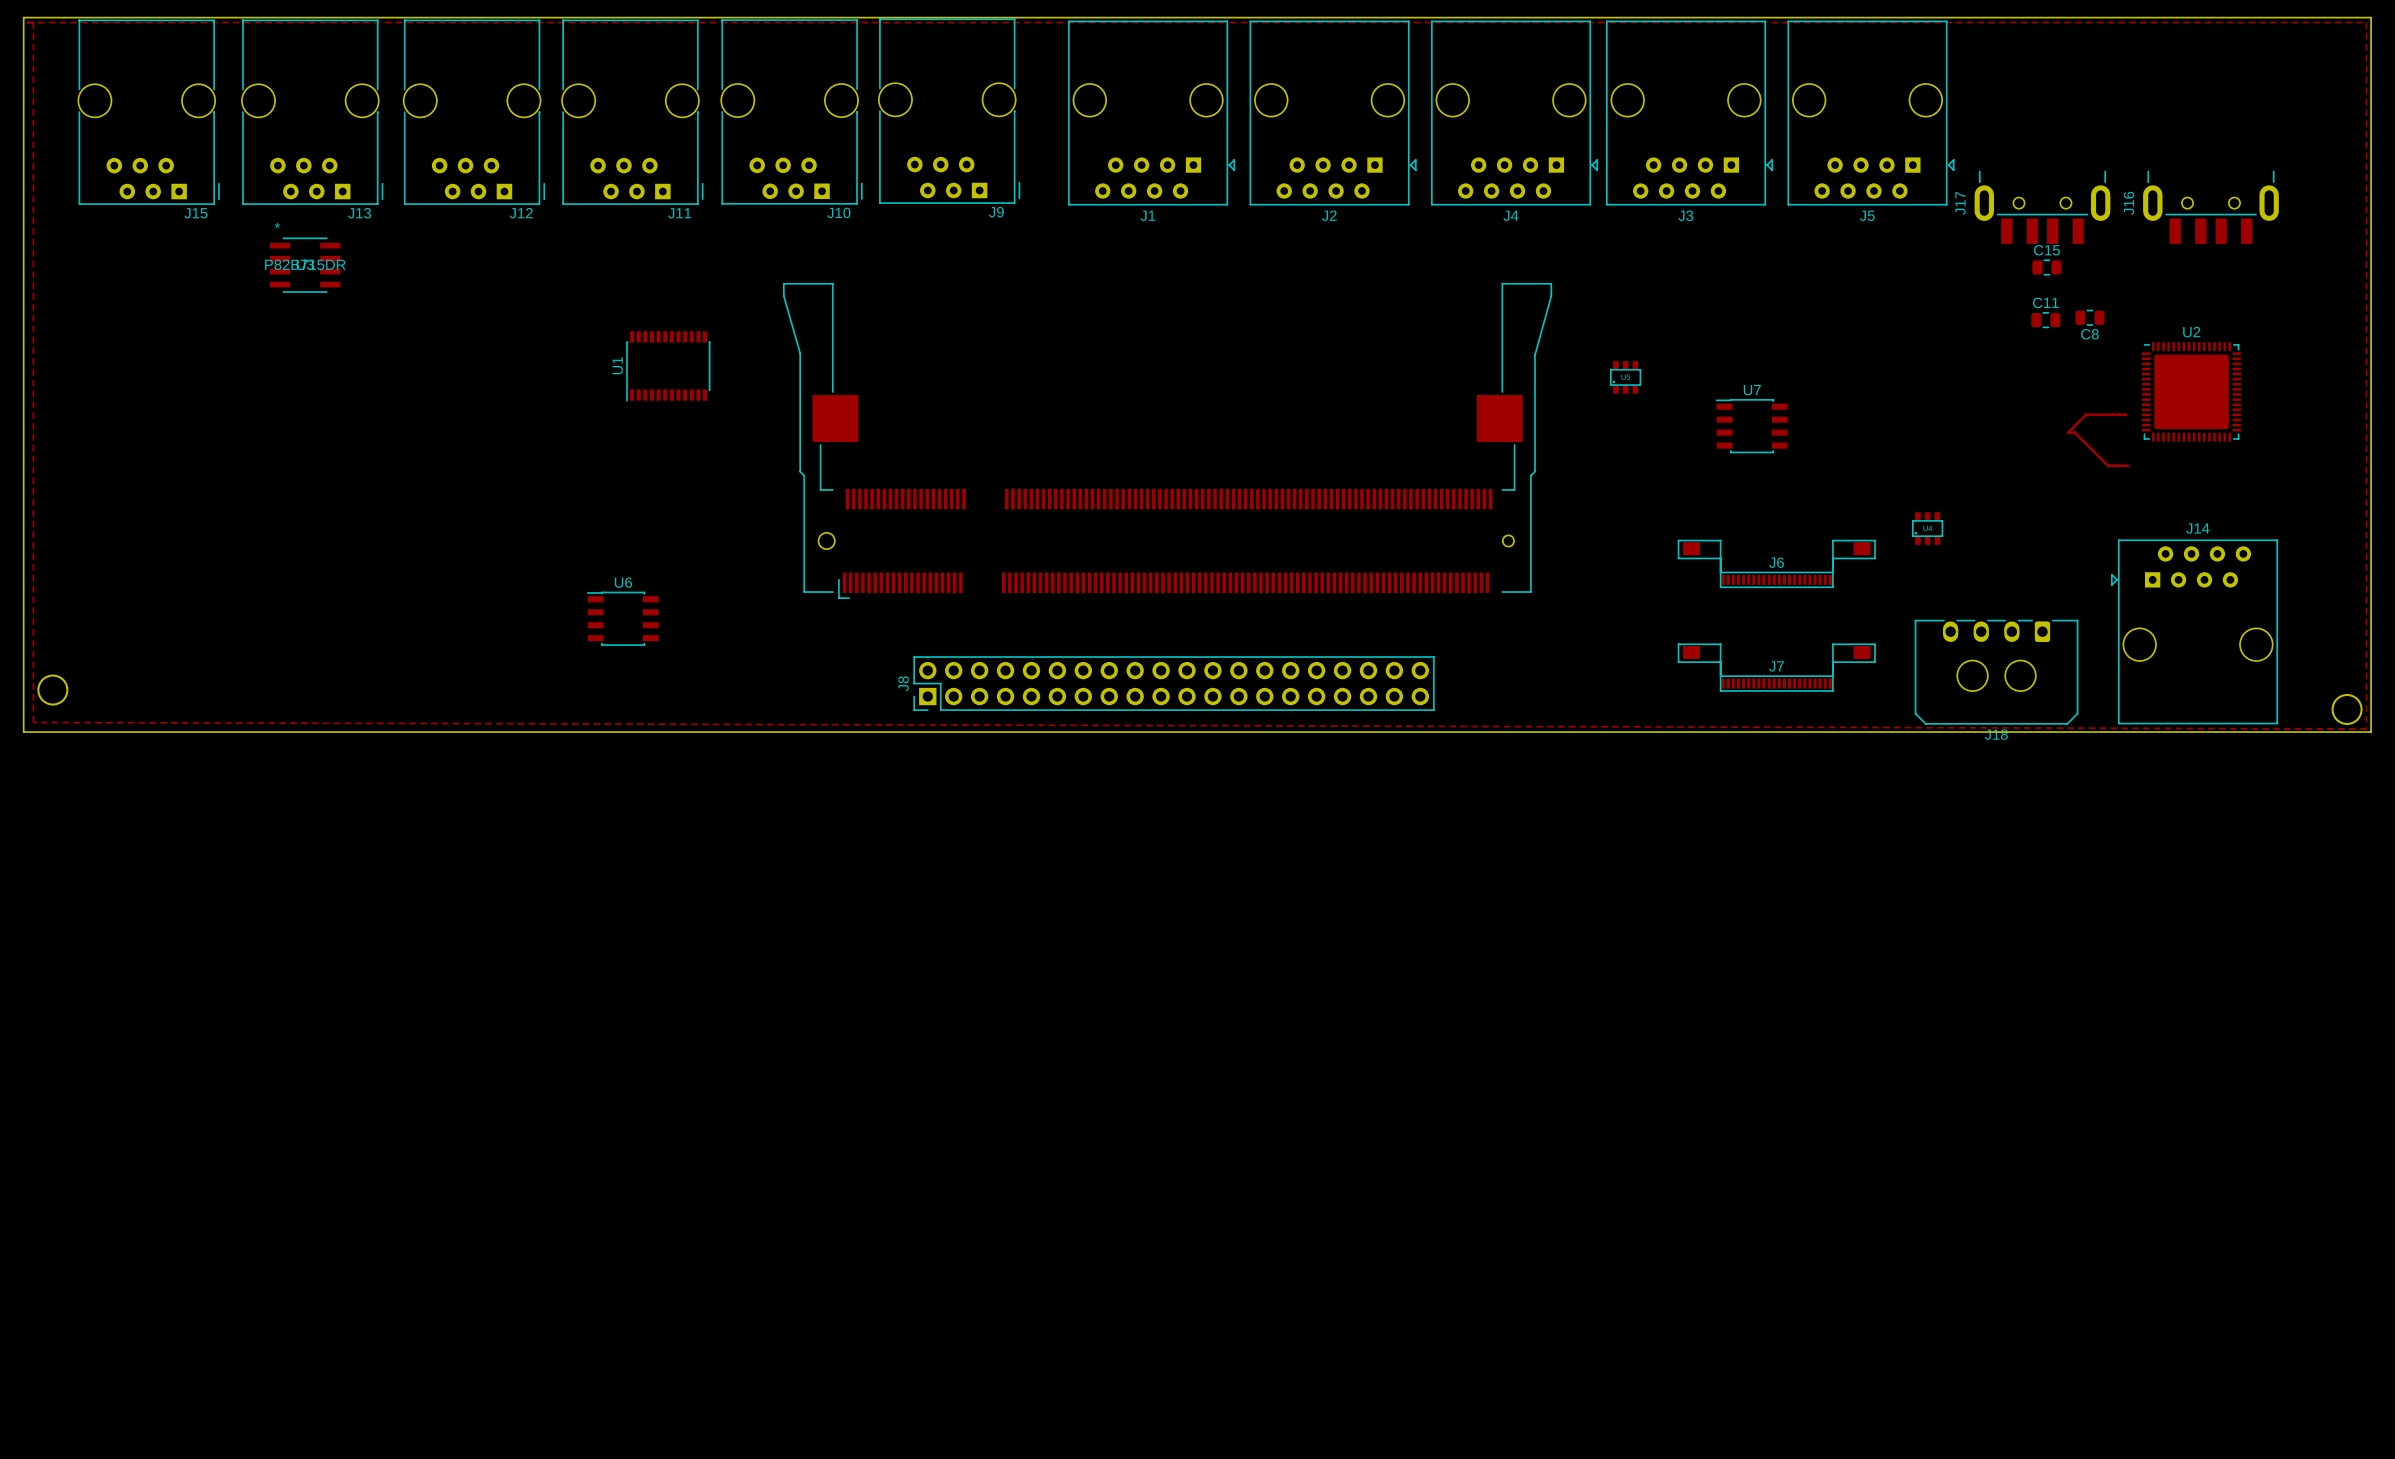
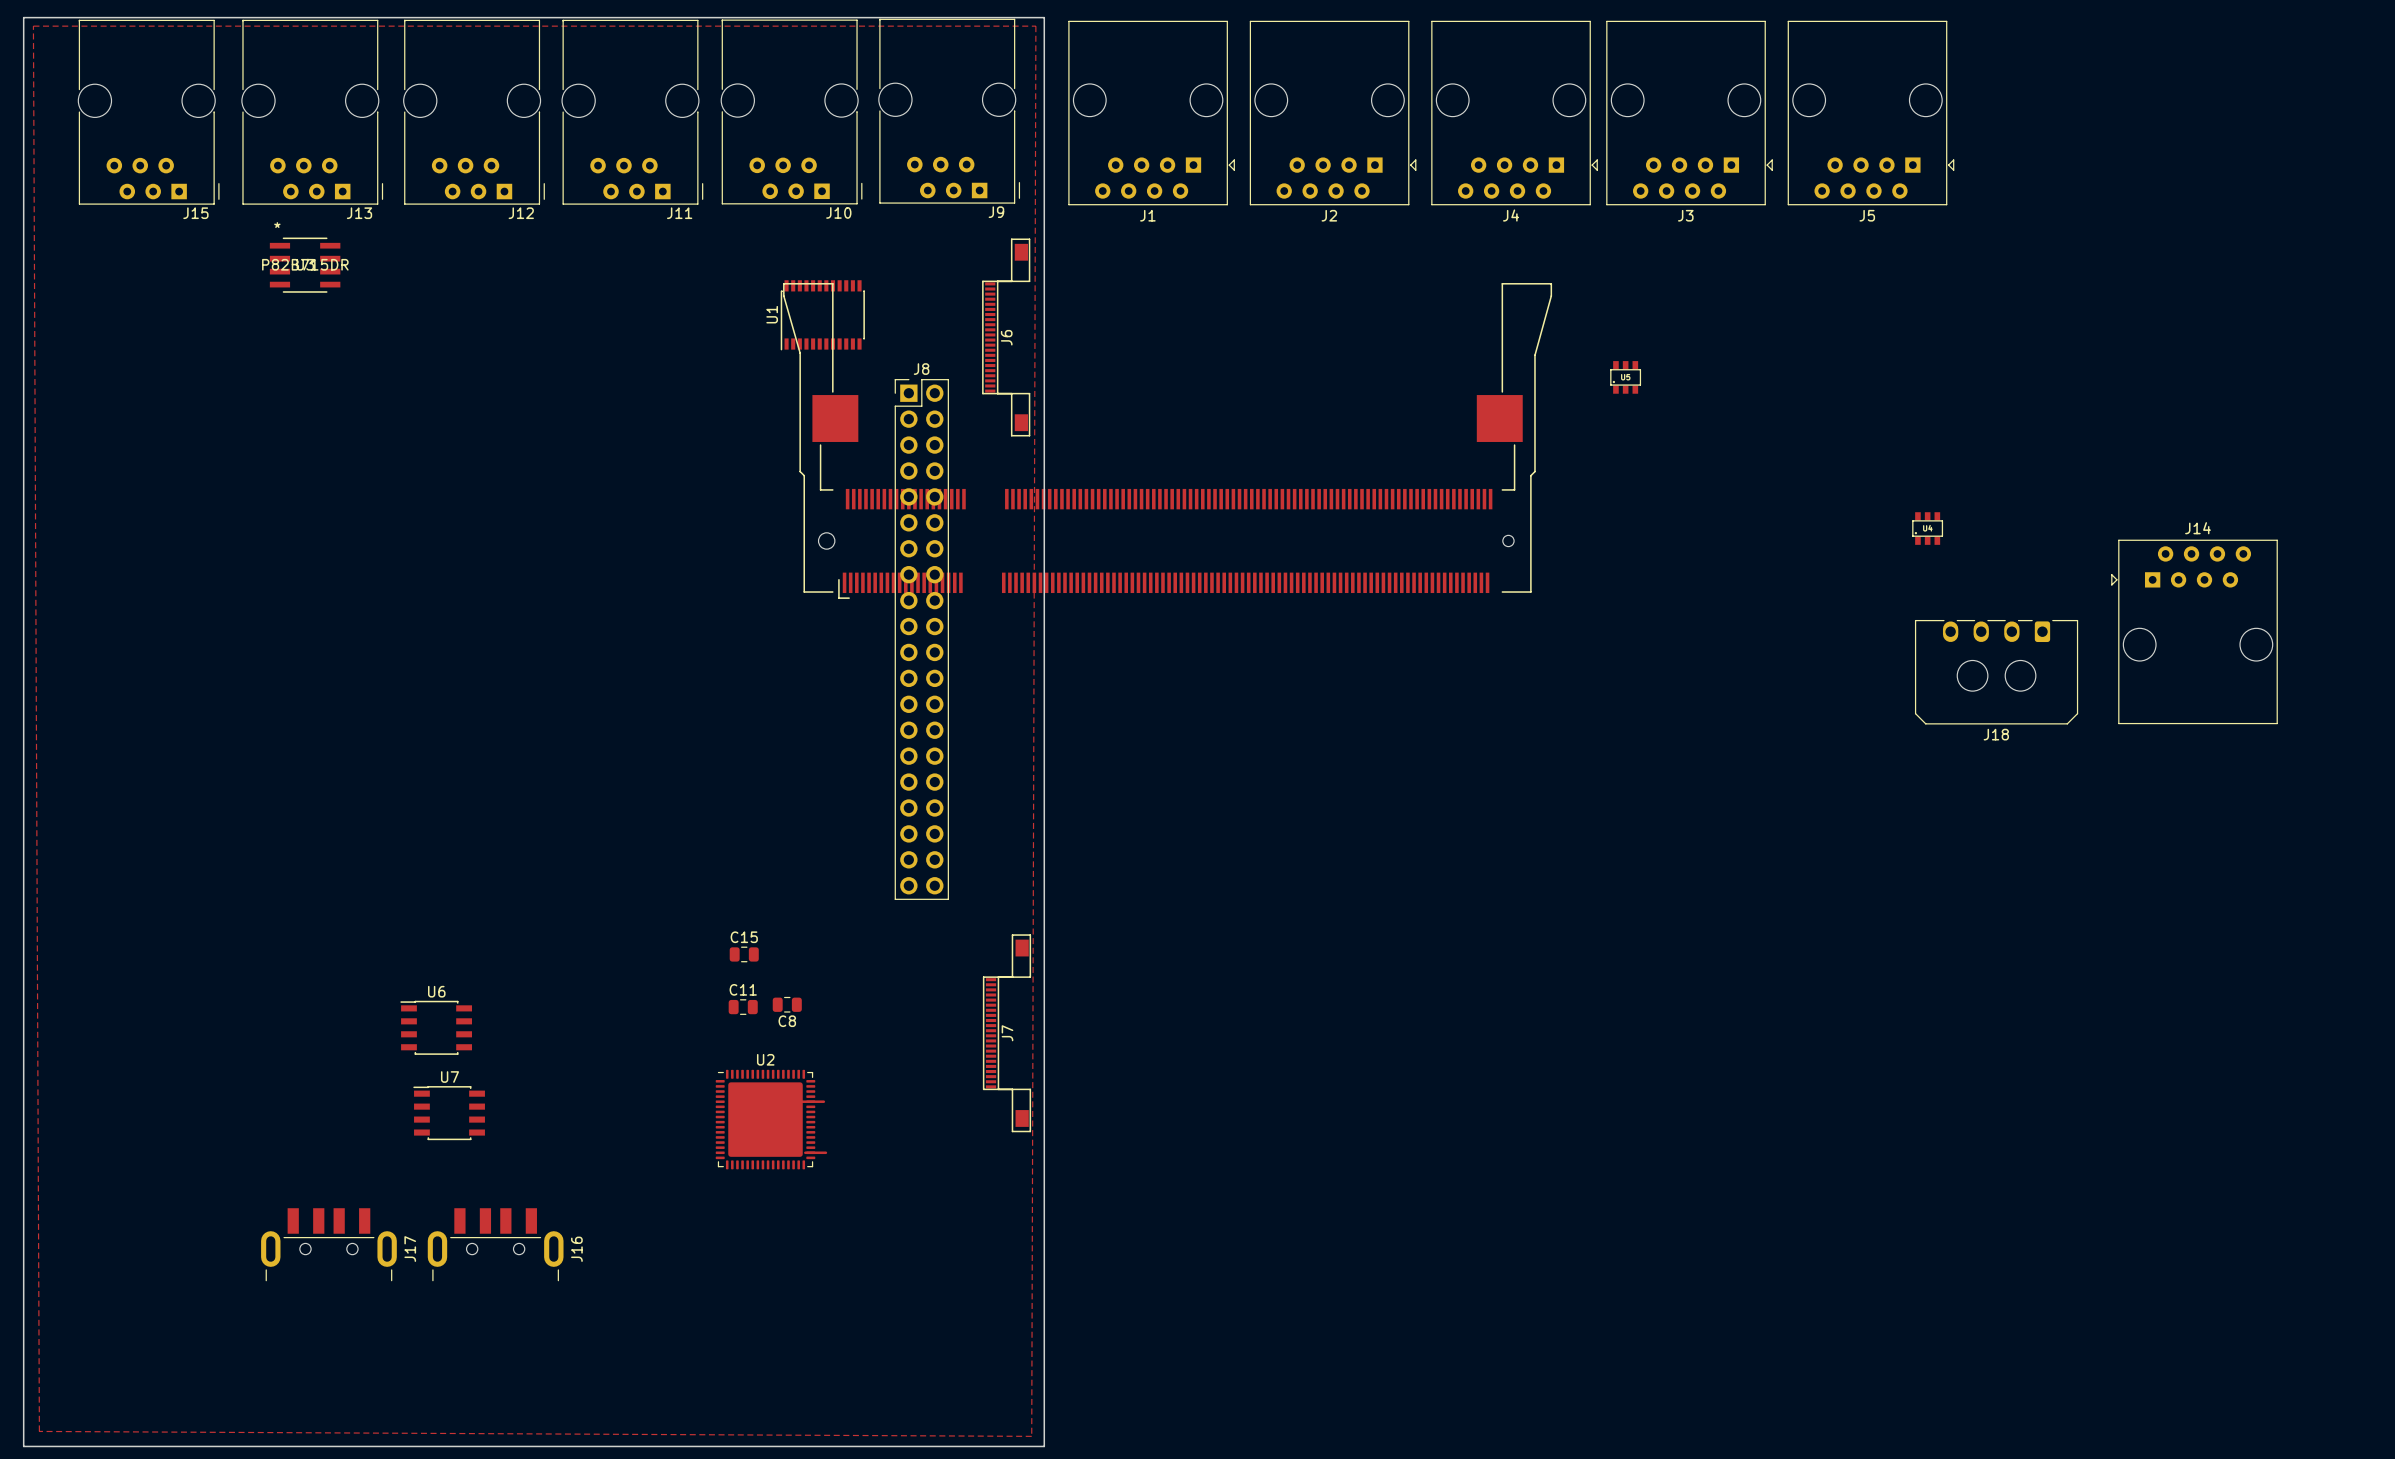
board edge: (1044, 17) (2371, 17) (2371, 732) (23, 732) -> (1044, 17) (1044, 1446) (23, 1446) (23, 732)
zone outline: (26, 22) (2366, 22) (2366, 728) (33, 722) (33, 22) -> none
zone outline: none -> (33, 26) (1035, 26) (1031, 1436) (39, 1431) (33, 26)
J17 rotation: 0° (2042, 207) -> 180° (328, 1244)
J17 position: (2042, 207) -> (328, 1244)
J16 rotation: 0° (2210, 207) -> 180° (495, 1244)
J16 position: (2210, 207) -> (495, 1244)
C15 position: (2046, 267) -> (744, 954)
C8 position: (2089, 317) -> (787, 1004)
C11 position: (2045, 320) -> (743, 1007)
U1 position: (668, 366) -> (822, 315)
U2 position: (2191, 391) -> (765, 1119)
track: (2126, 414) (2086, 414) (2068, 432) (2074, 432) (2107, 465) (2128, 465) -> none
U7 position: (1751, 426) -> (449, 1113)
J6 rotation: 0° (1776, 563) -> 90° clockwise (1006, 337)
J6 position: (1776, 563) -> (1006, 337)
U6 position: (622, 618) -> (436, 1027)
J7 rotation: 0° (1776, 667) -> 90° clockwise (1006, 1033)
J7 position: (1776, 667) -> (1006, 1033)
round board edge: [37, 674, 69, 706] -> none
J8 rotation: 0° (1174, 683) -> 90° clockwise (921, 639)
round board edge: [2331, 693, 2363, 725] -> none
track: none -> (783, 1101) (823, 1101)
track: none -> (805, 1152) (825, 1152)

